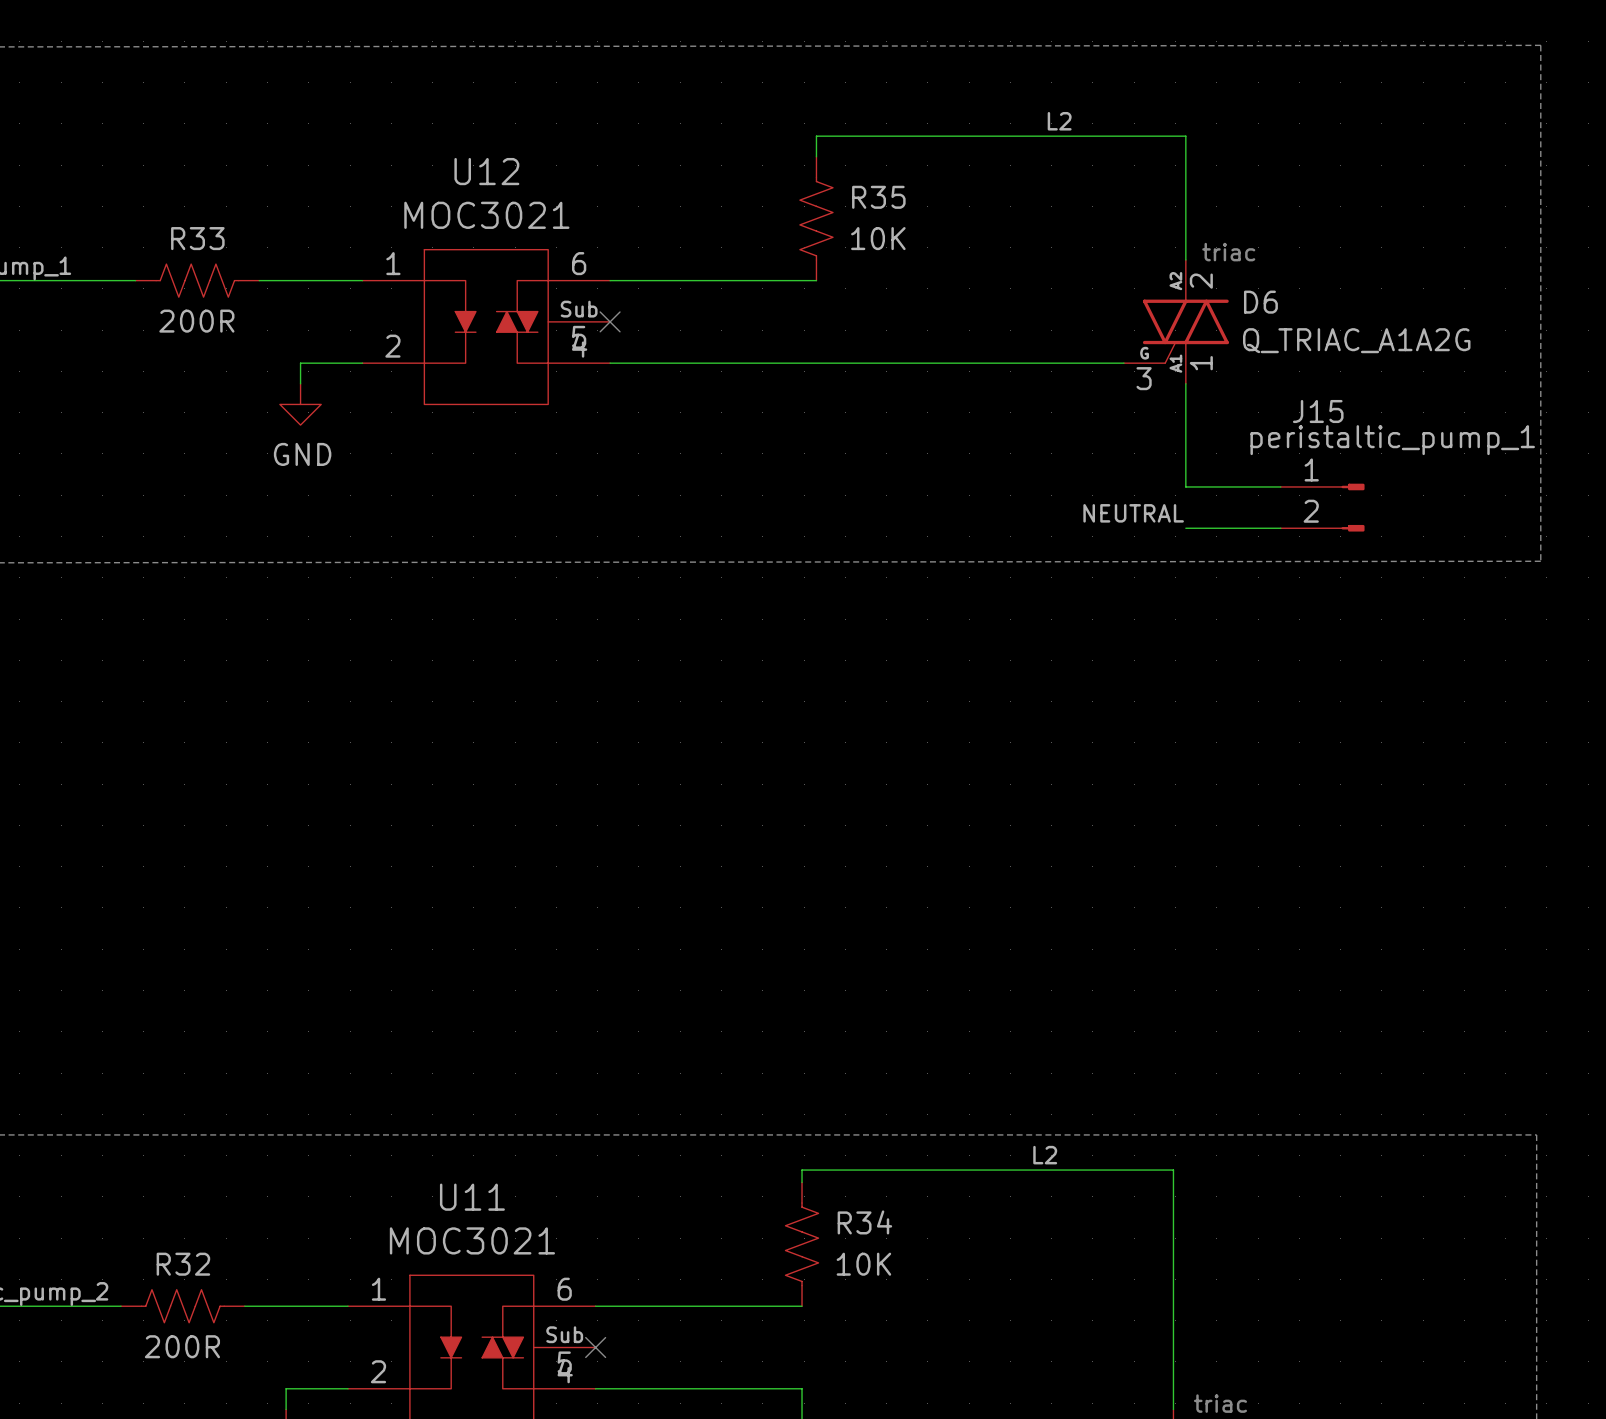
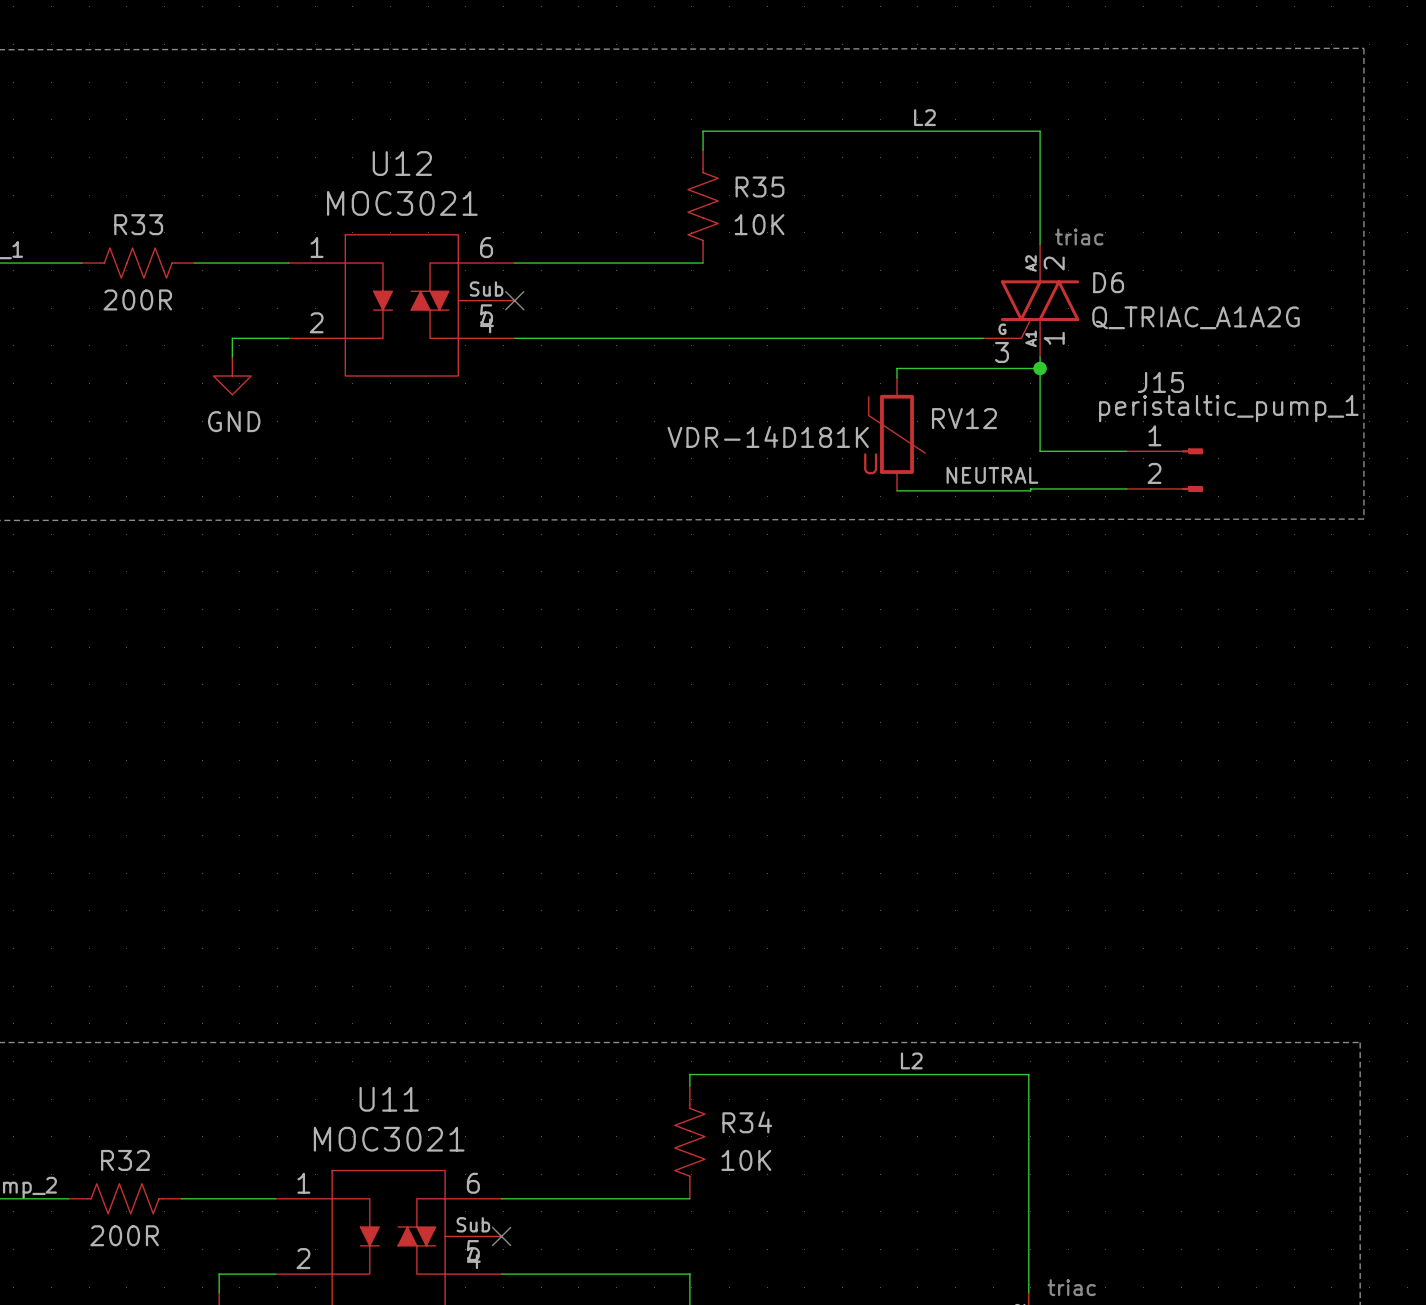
wire: none -> (1040, 368) (897, 368) (897, 377)
junction: none -> (1040, 368)
RV12: none -> VDR-14D181K (897, 434)
wire: none -> (1040, 488) (1030, 488) (1030, 490) (897, 490)

